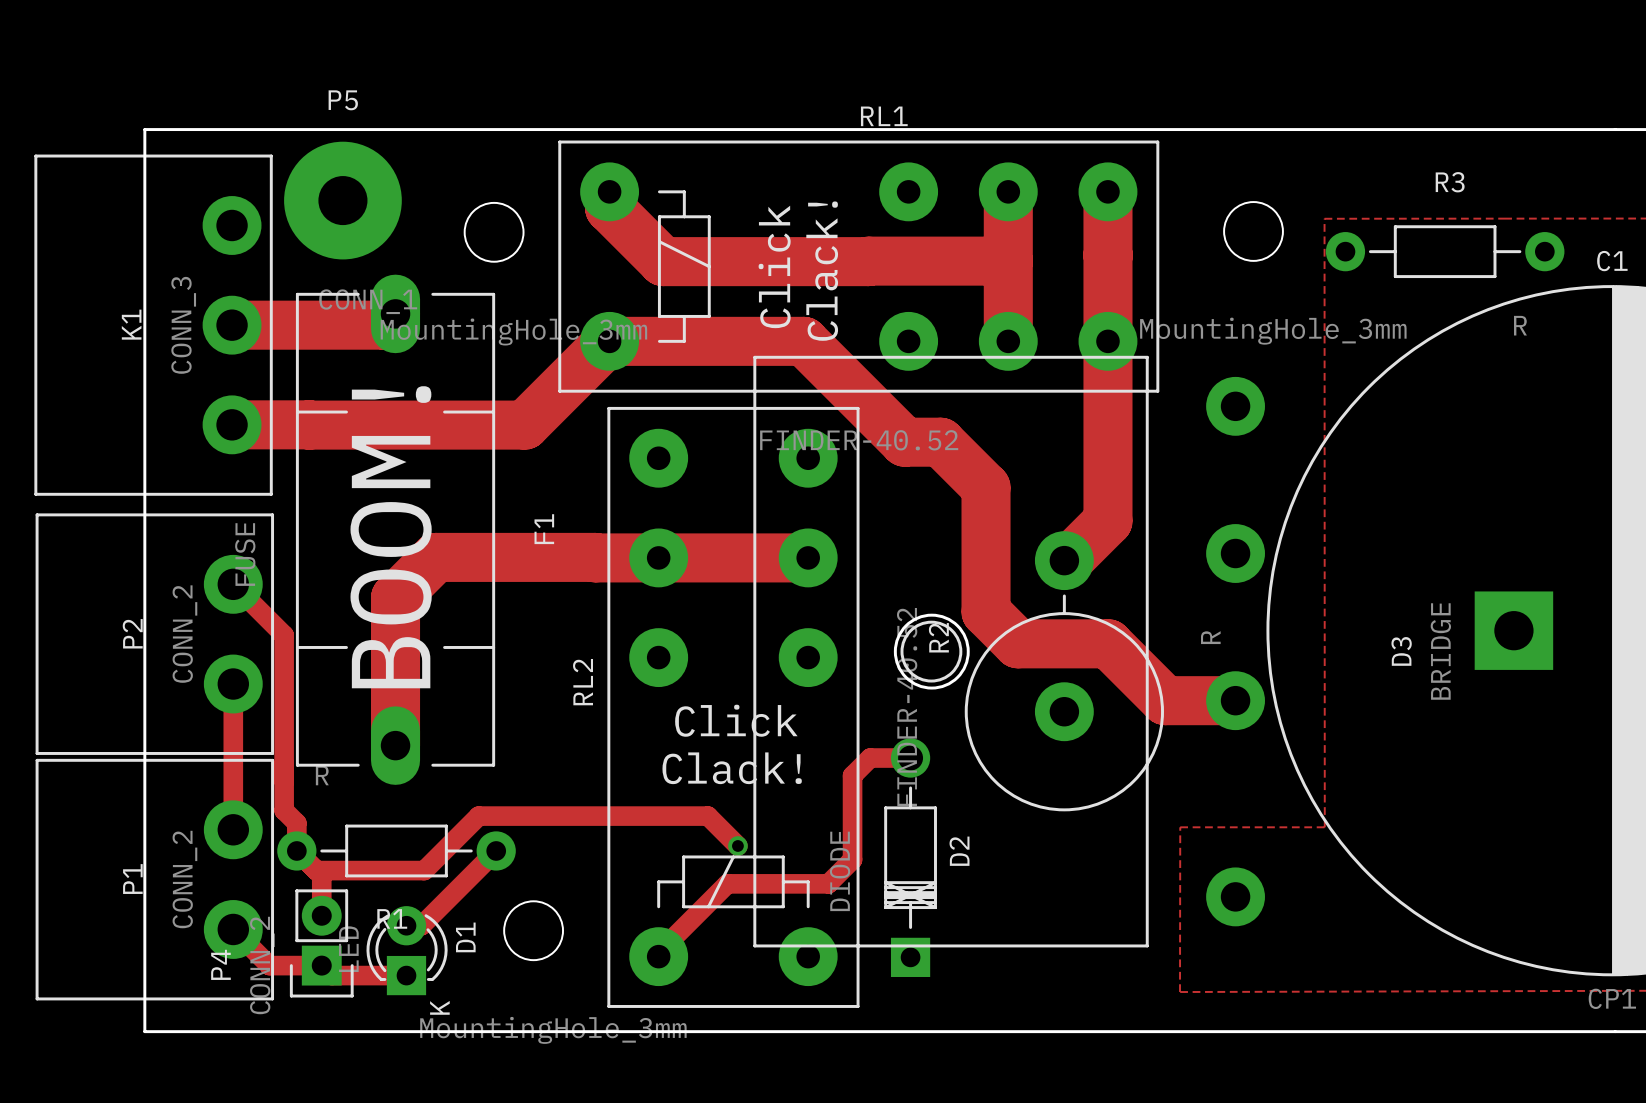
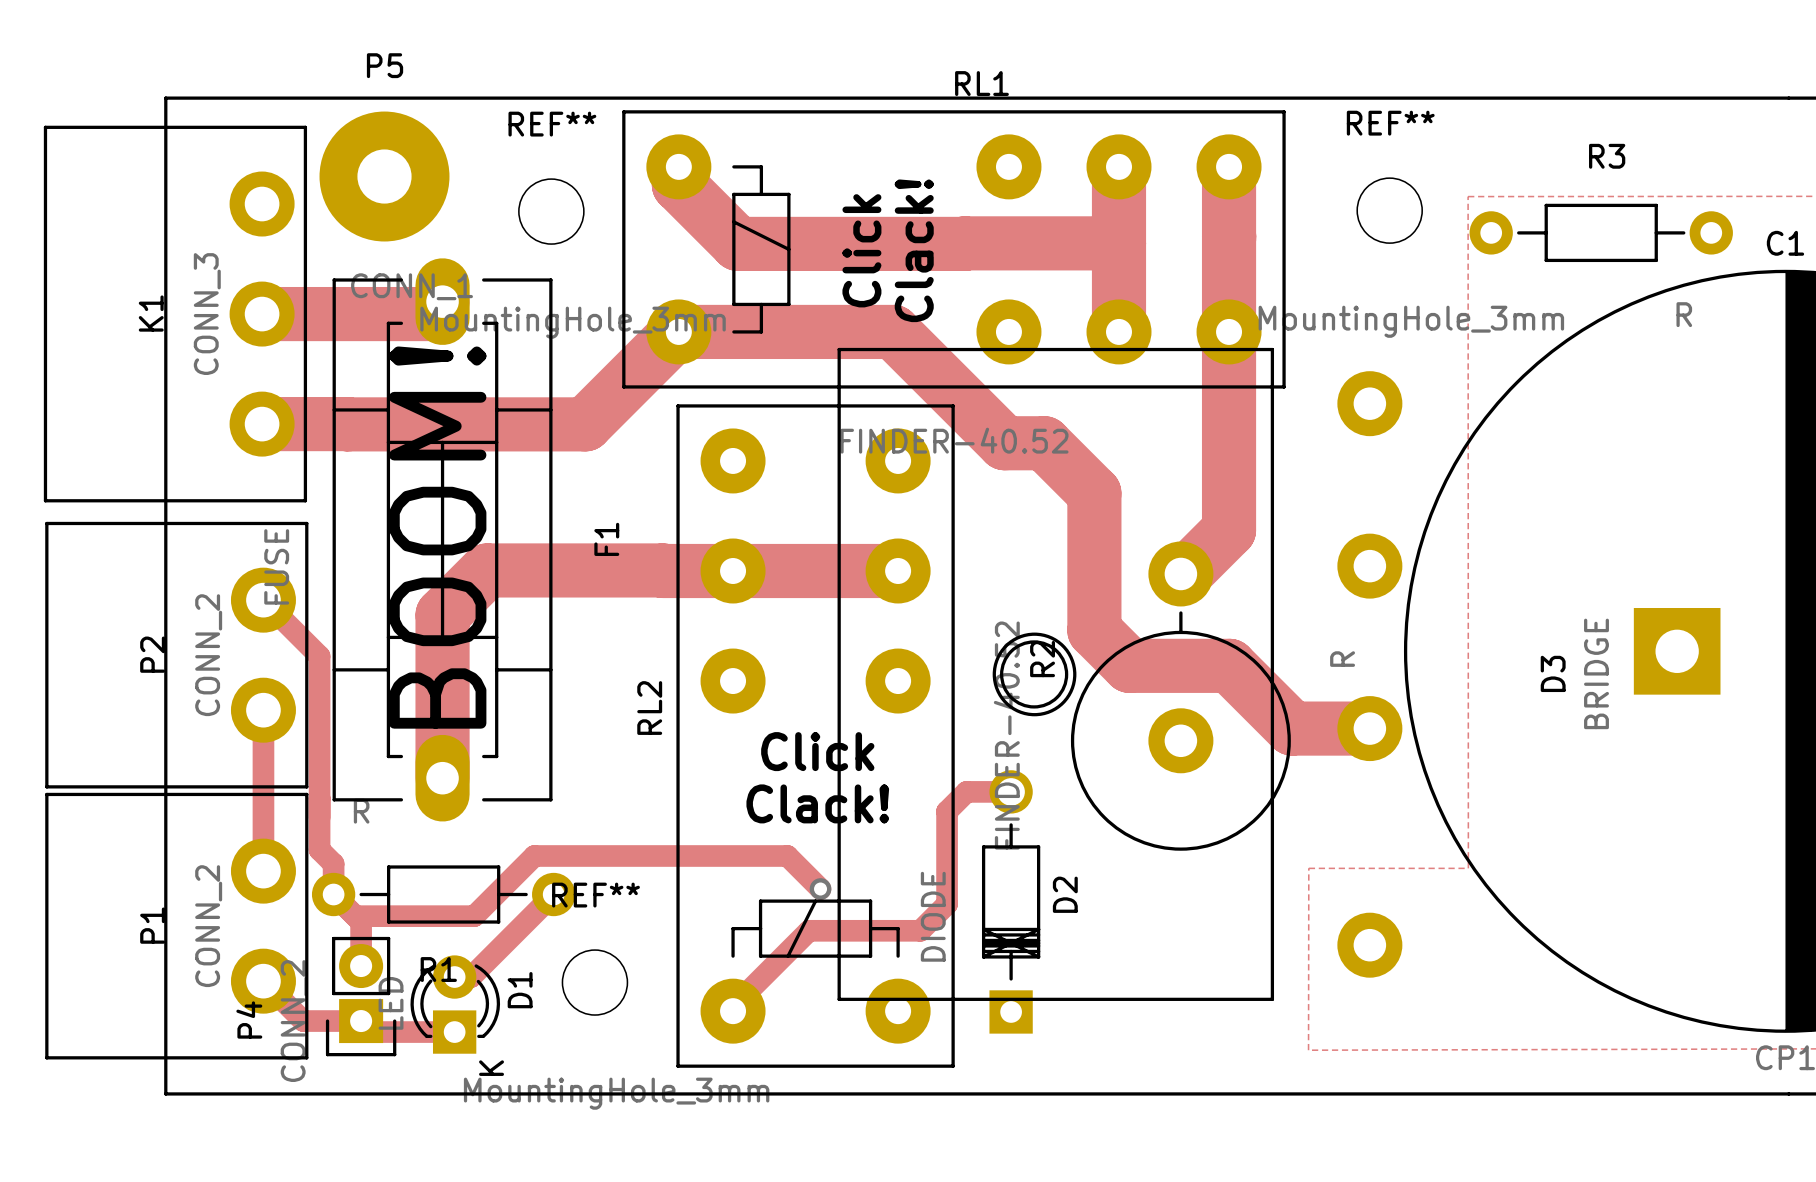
REF** name: none -> REF** (1390, 123)
REF** name: none -> REF** (552, 124)
F1 footprint: [295, 274, 496, 785] -> [332, 258, 553, 822]
REF** name: none -> REF** (595, 895)

